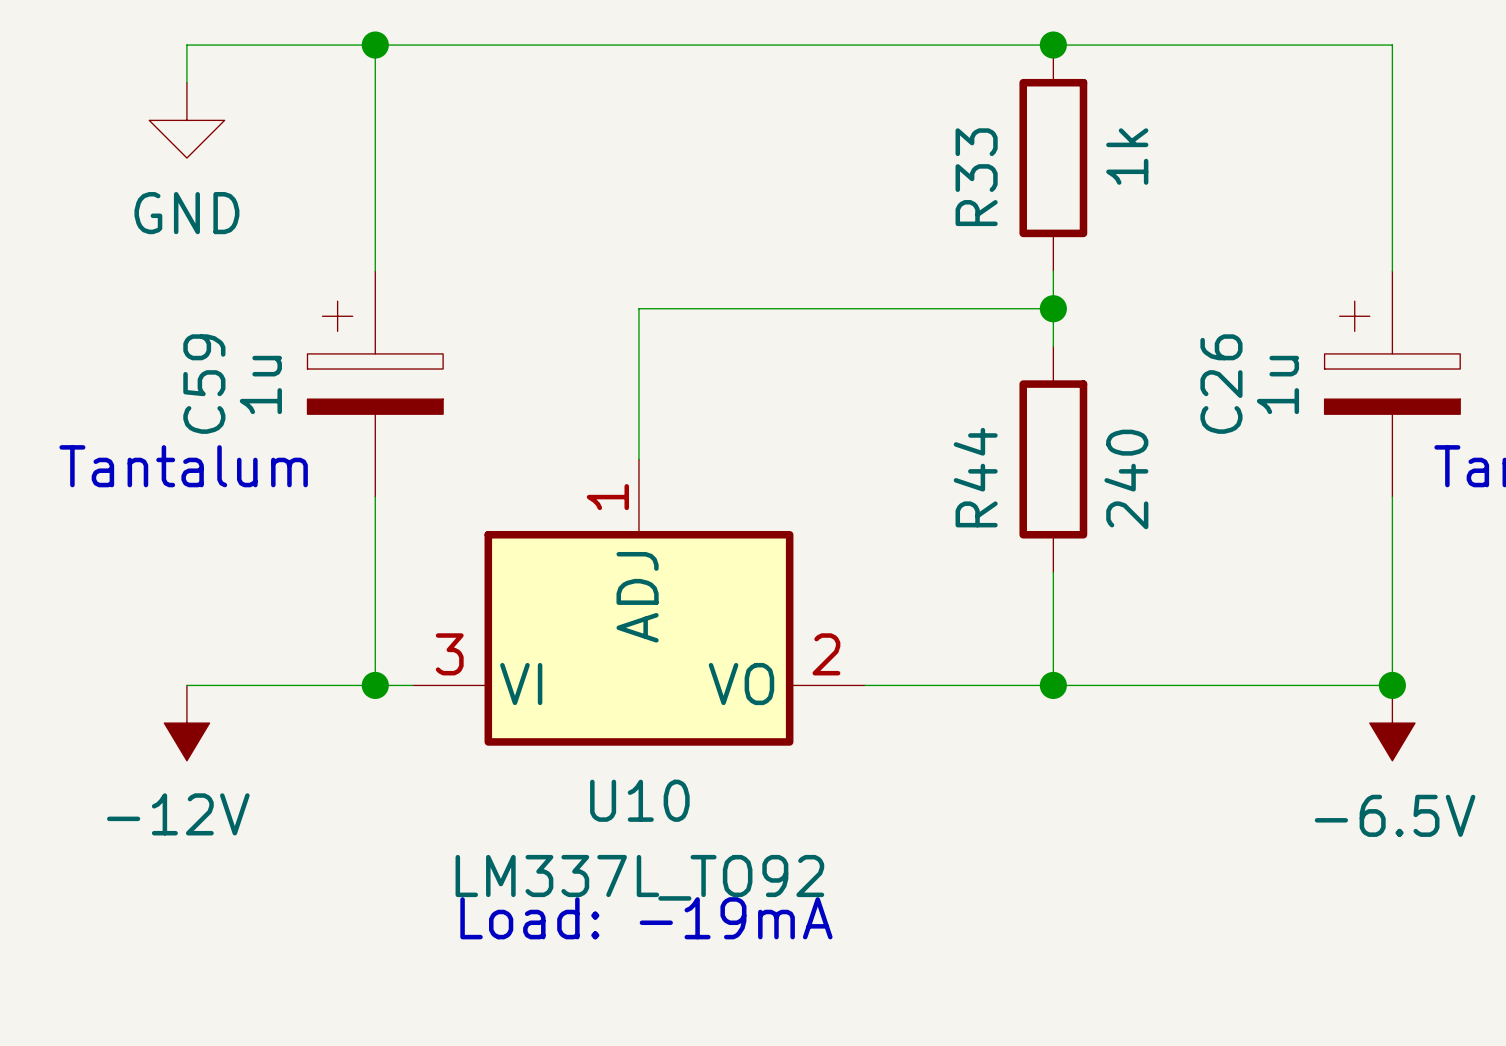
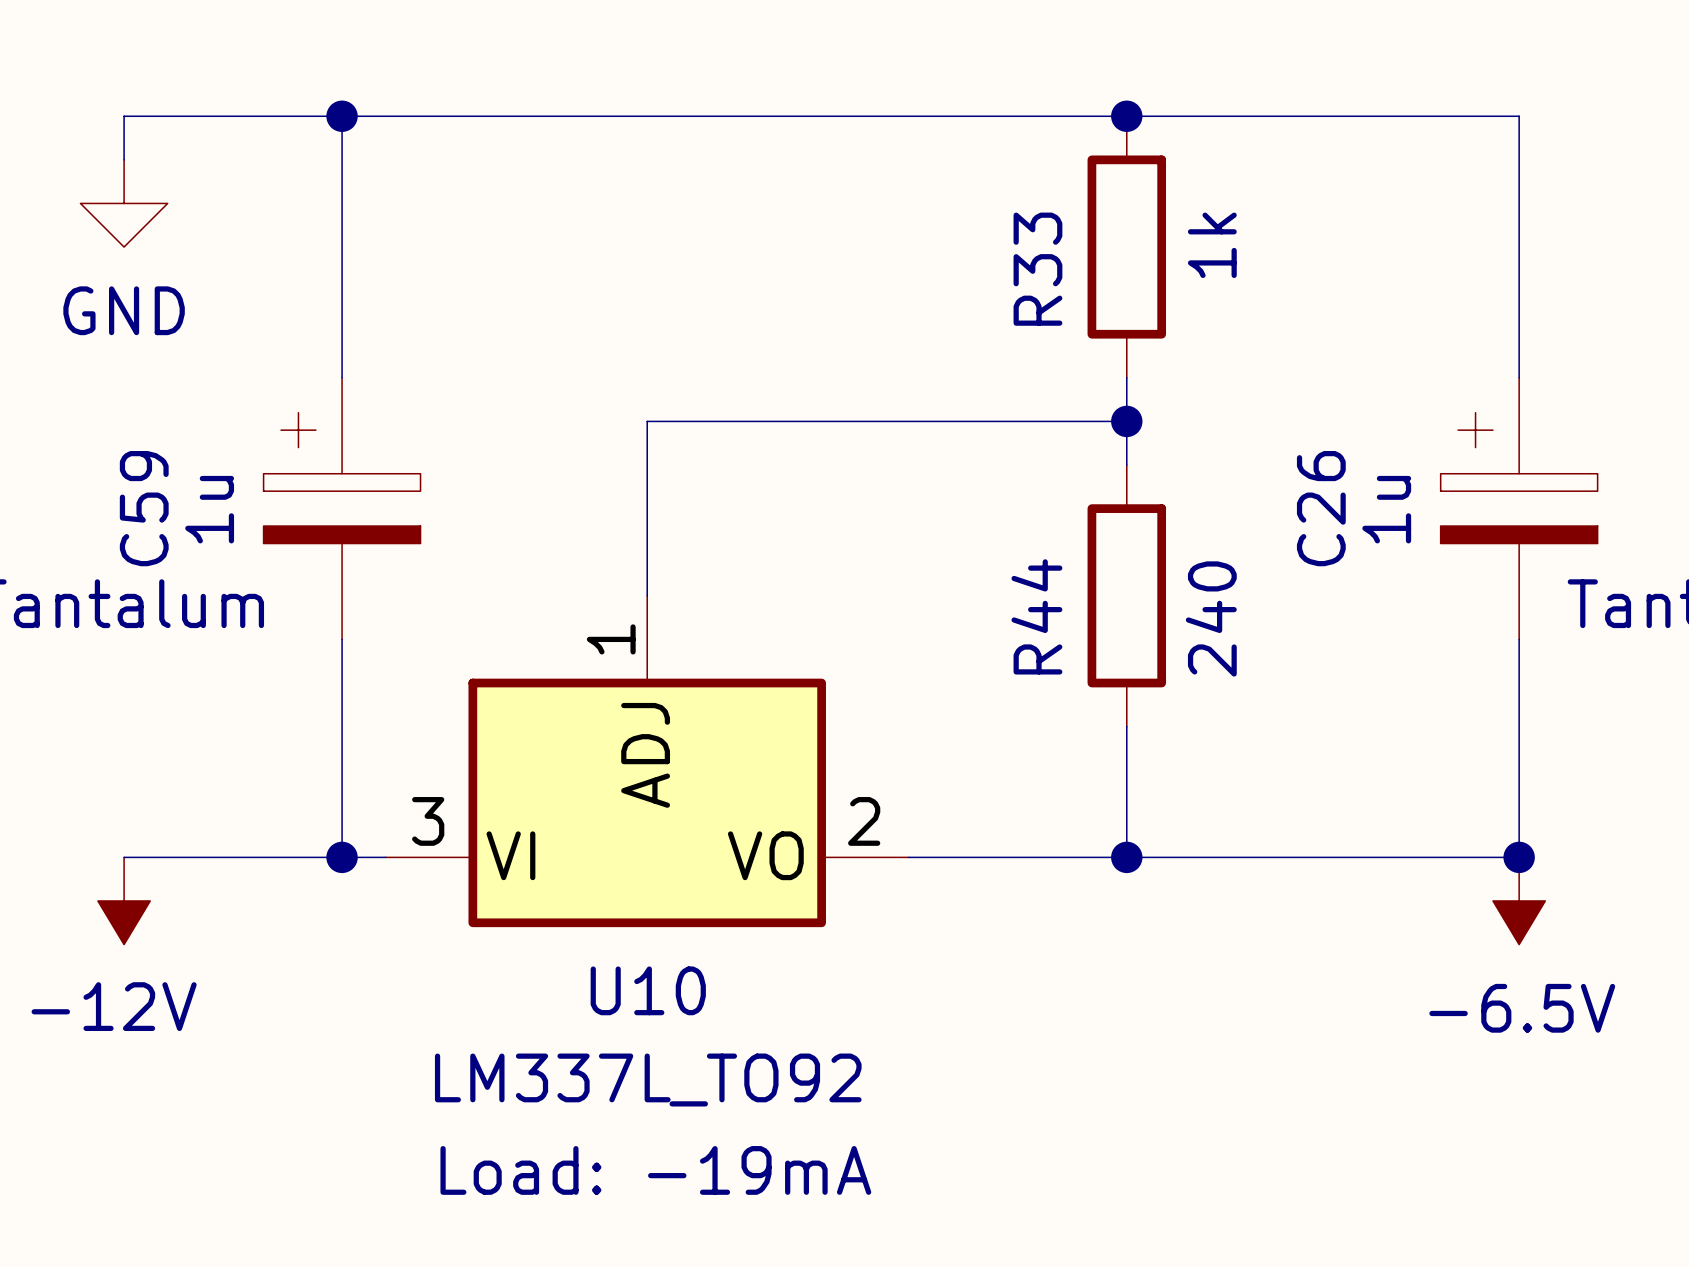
text position: Load: -19mA (646, 918) -> Load: -19mA (655, 1170)

